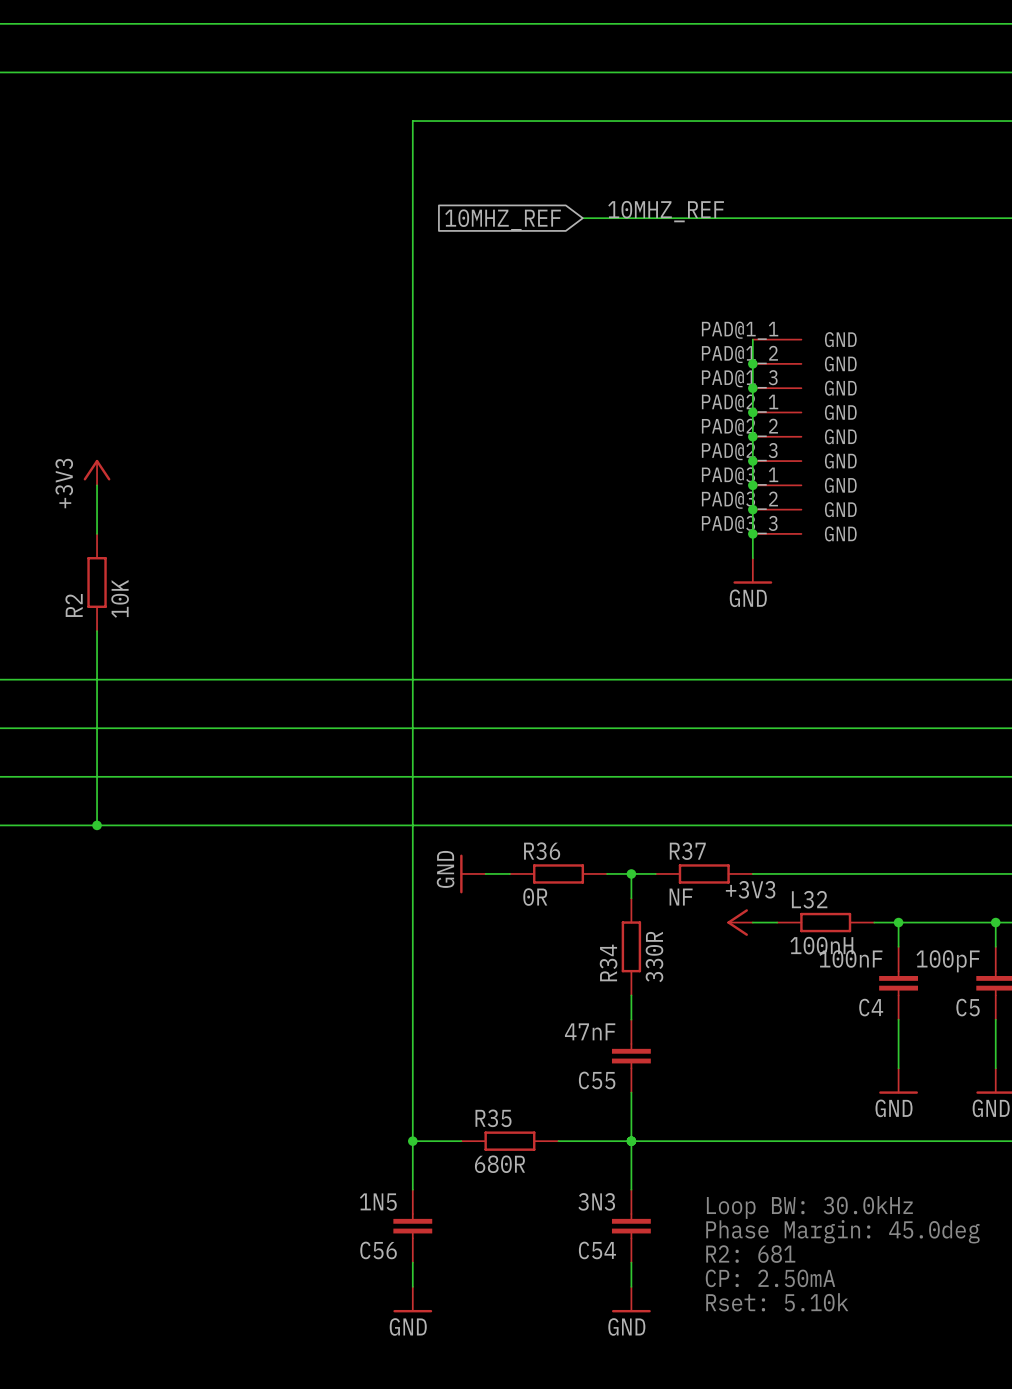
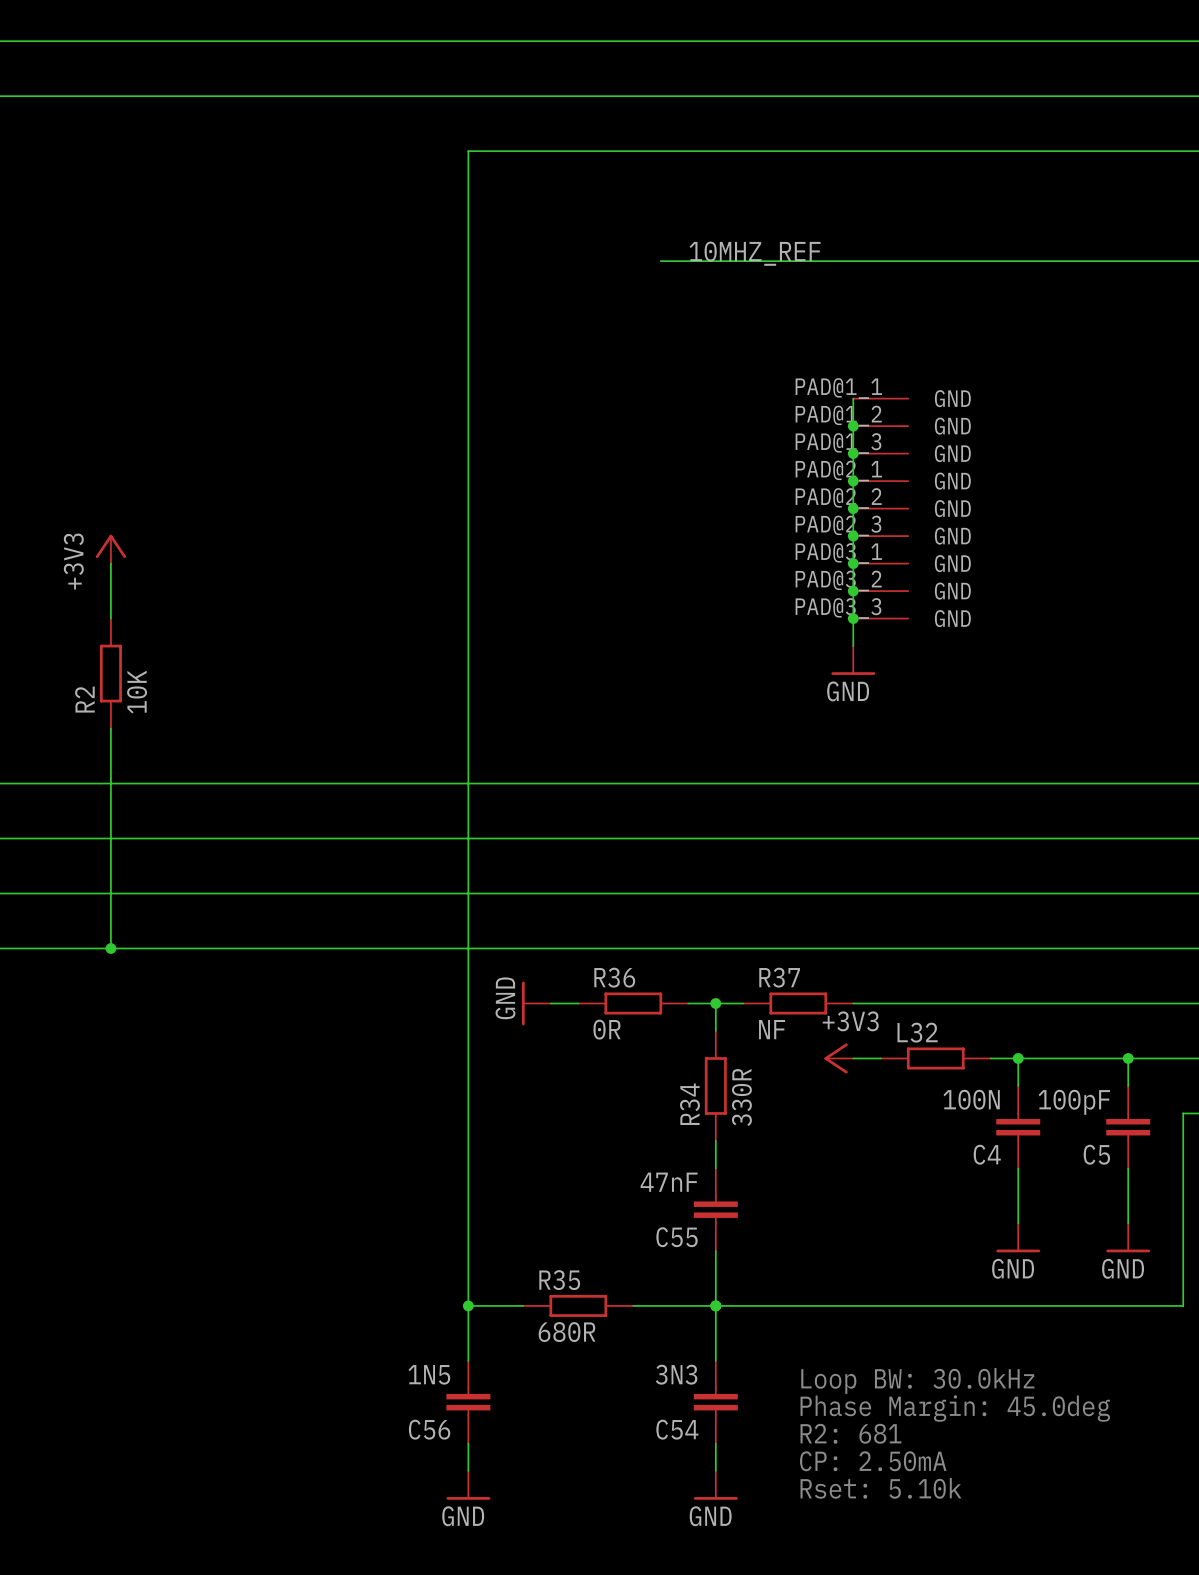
global label: 10MHZ_REF (503, 220) -> none
L32 value: 100nH (821, 945) -> none
C4 value: 100nF (850, 958) -> 100N (971, 1099)

